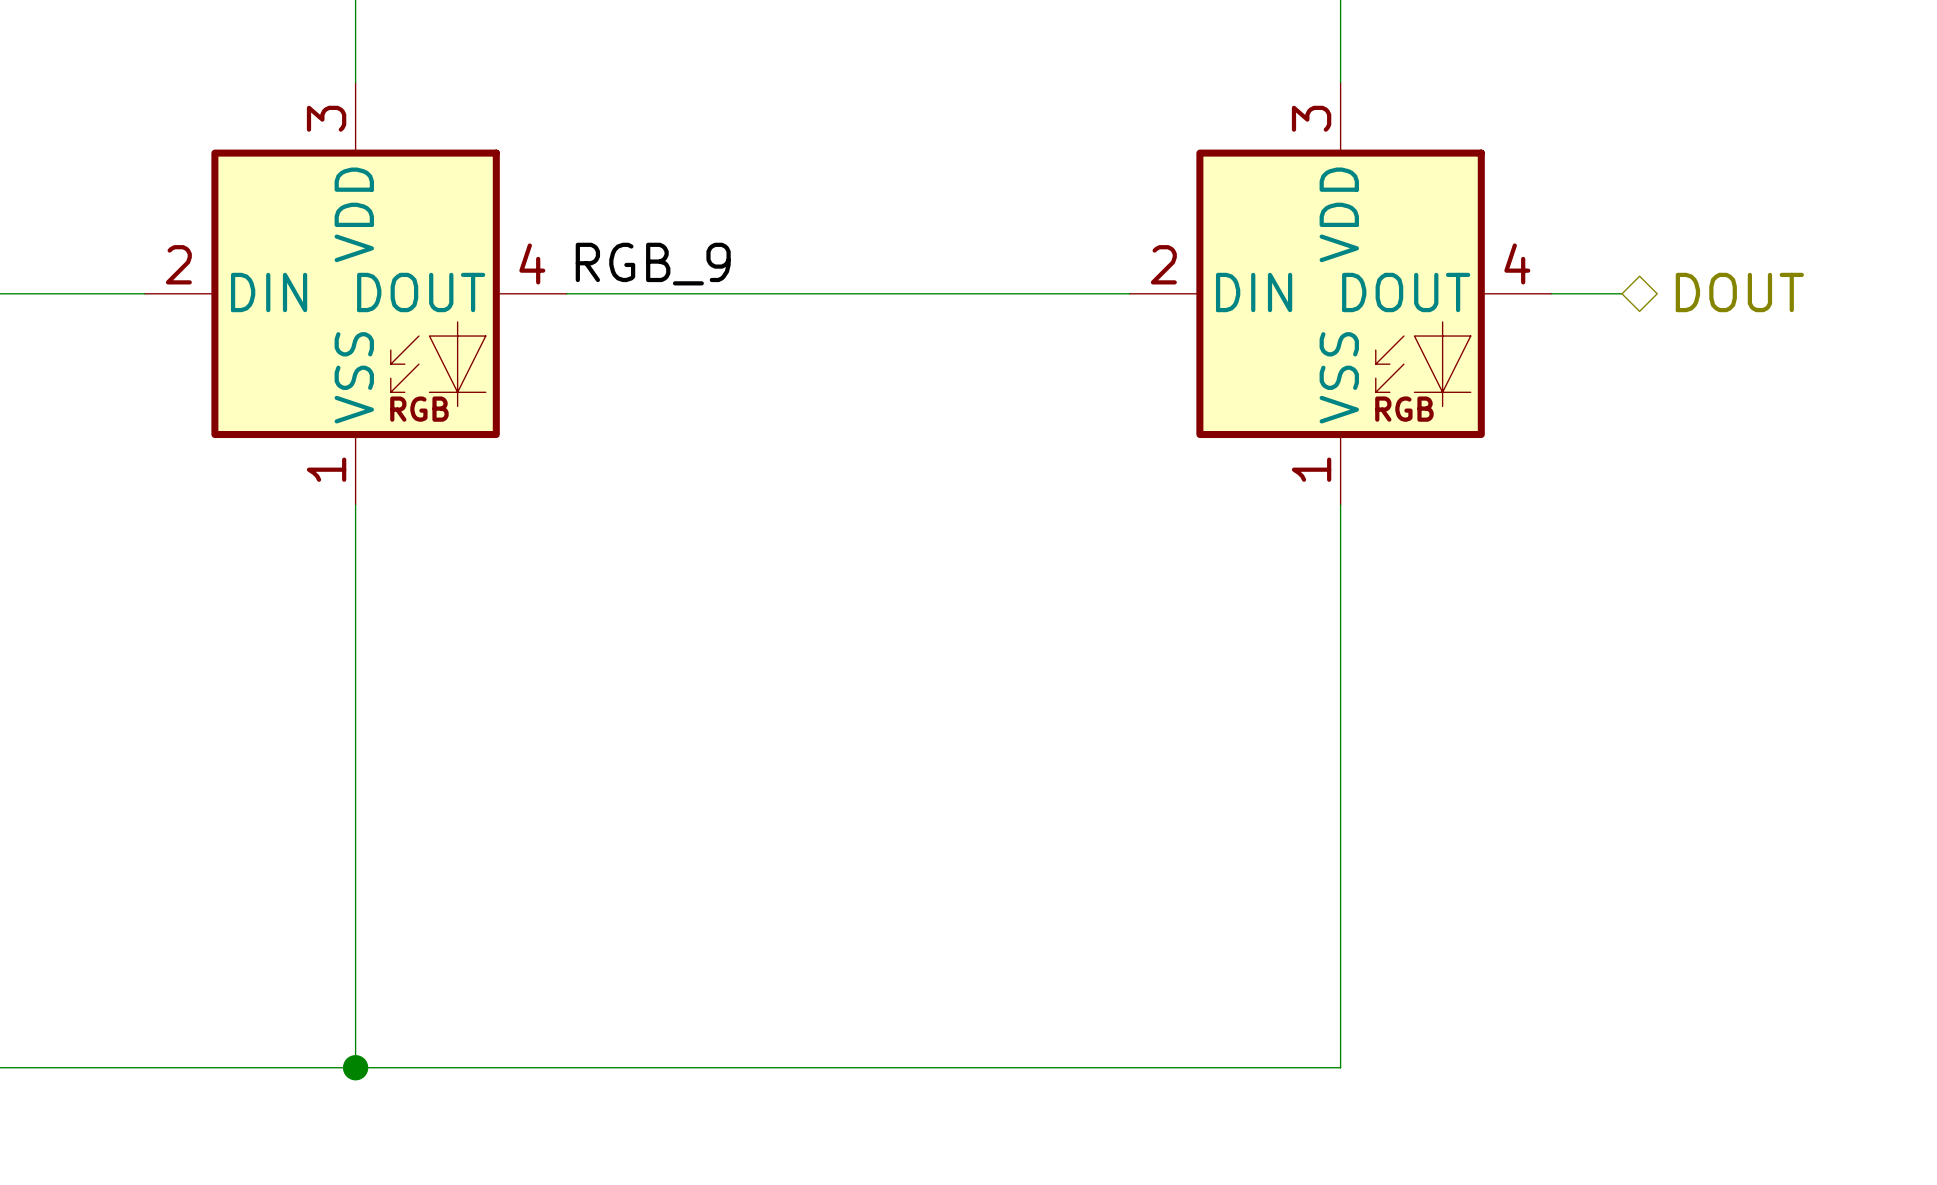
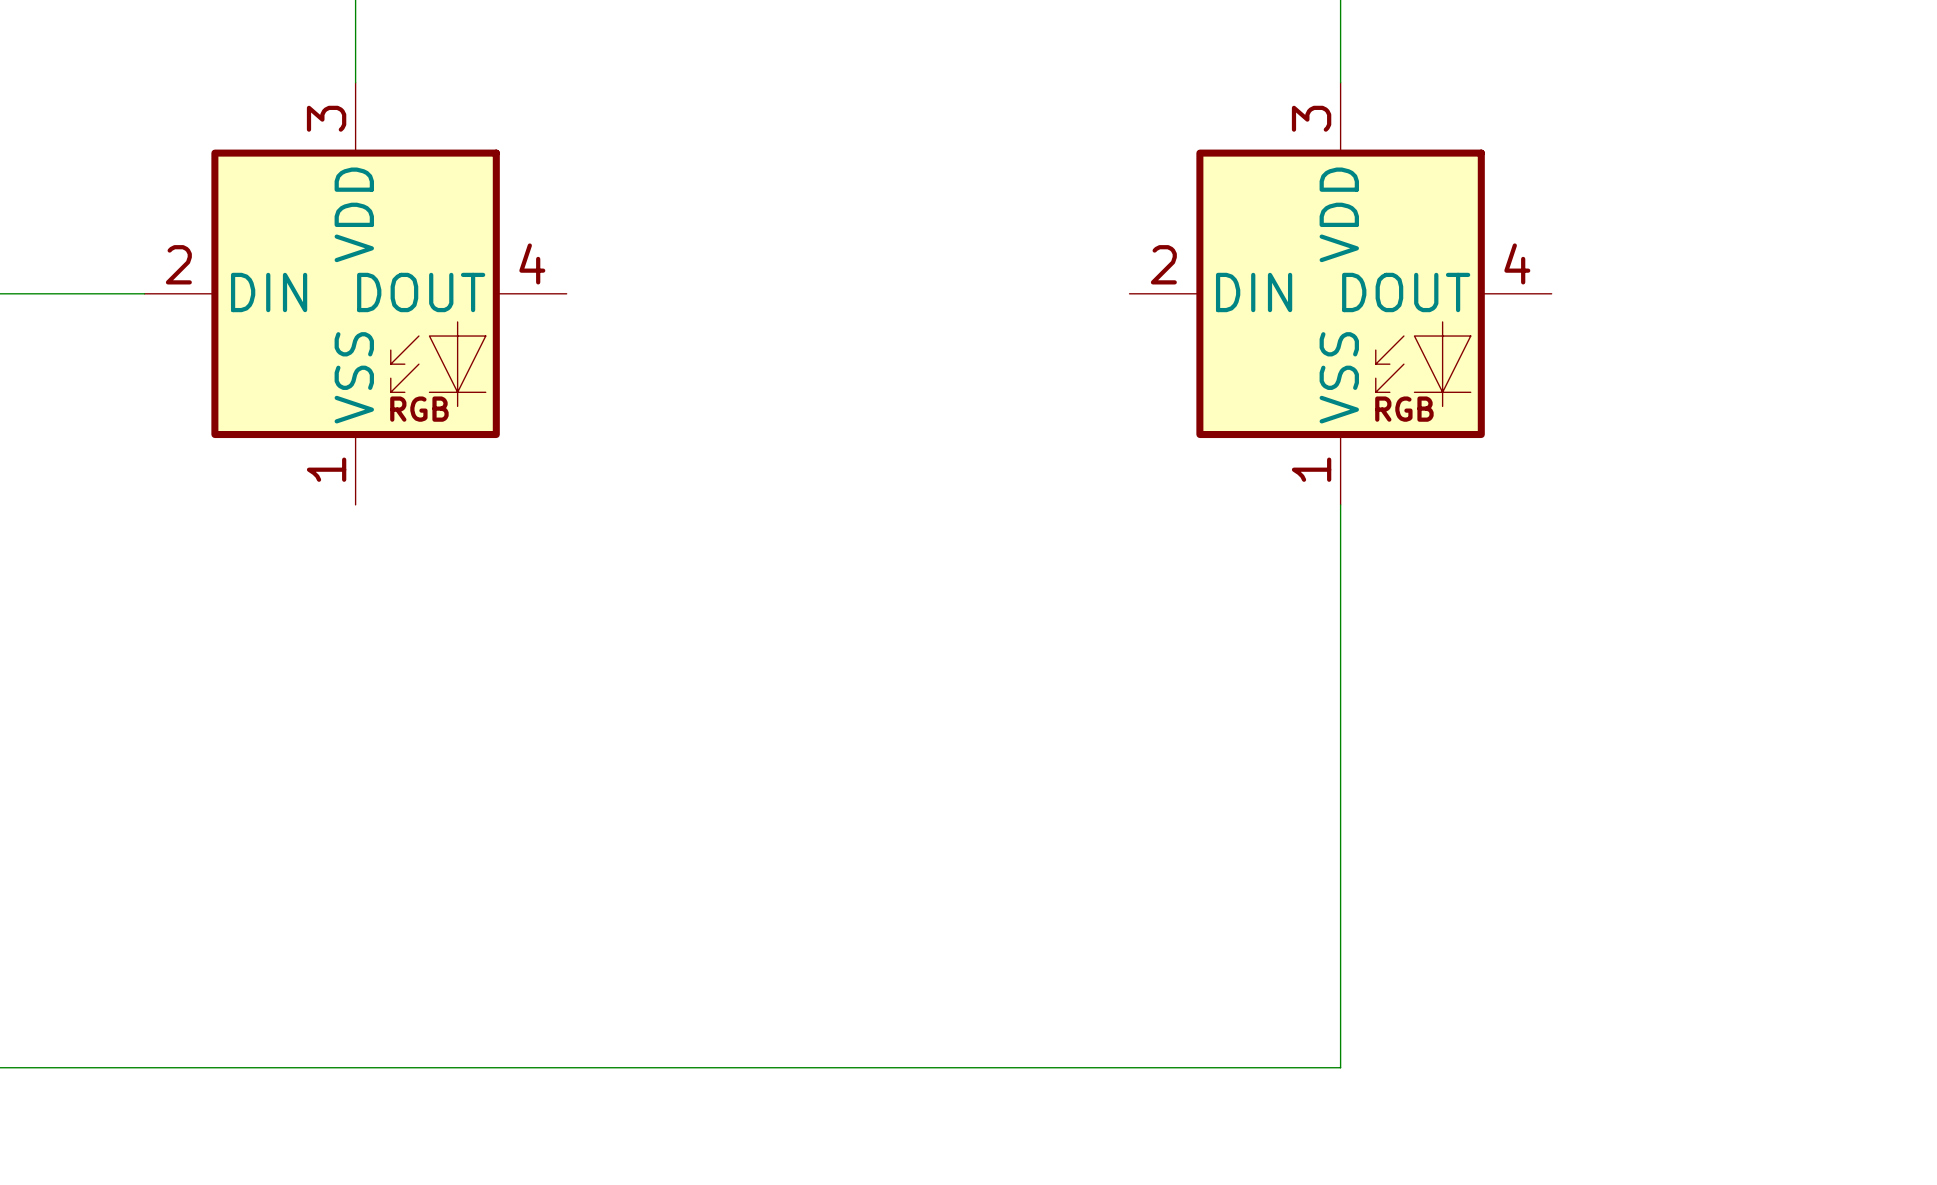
label: RGB_9 (653, 264) -> none
hierarchical label: DOUT (1739, 292) -> none
wire: (566, 293) (1129, 293) -> none
wire: (1551, 293) (1622, 293) -> none
wire: (355, 504) (355, 1067) -> none
junction: (355, 1067) -> none

